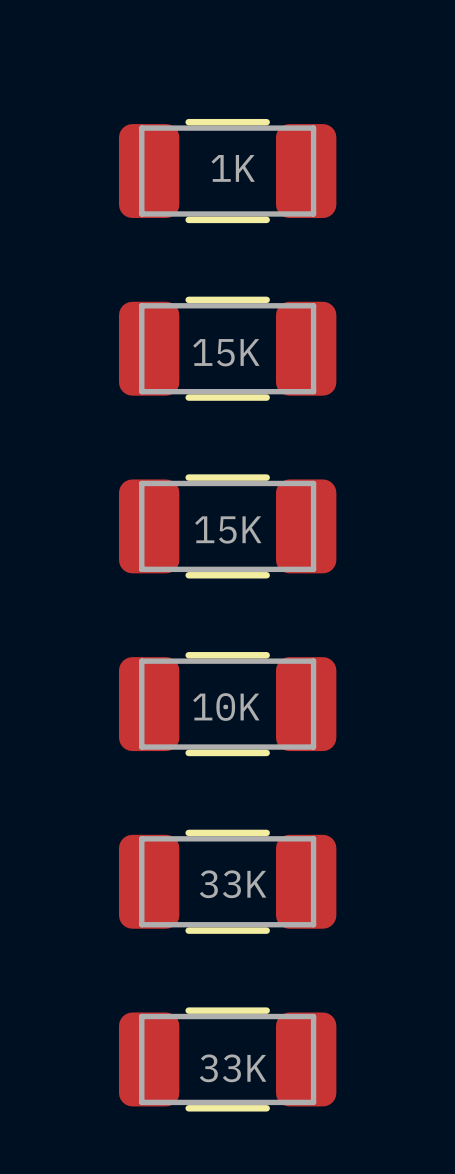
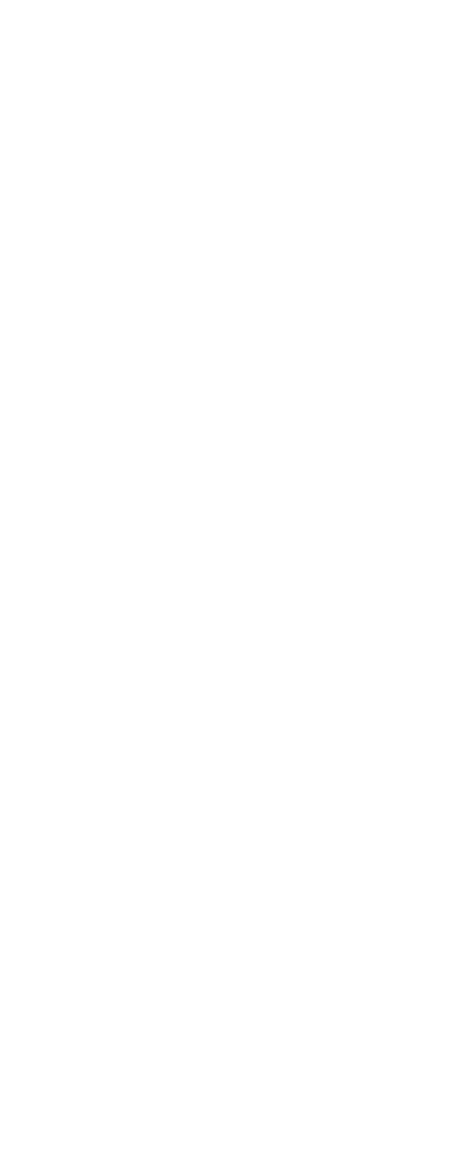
part: 1K (227, 171) -> none
part: 15K (227, 348) -> none
part: 15K (227, 526) -> none
part: 10K (227, 704) -> none
part: 33K (227, 881) -> none
part: 33K (227, 1059) -> none

